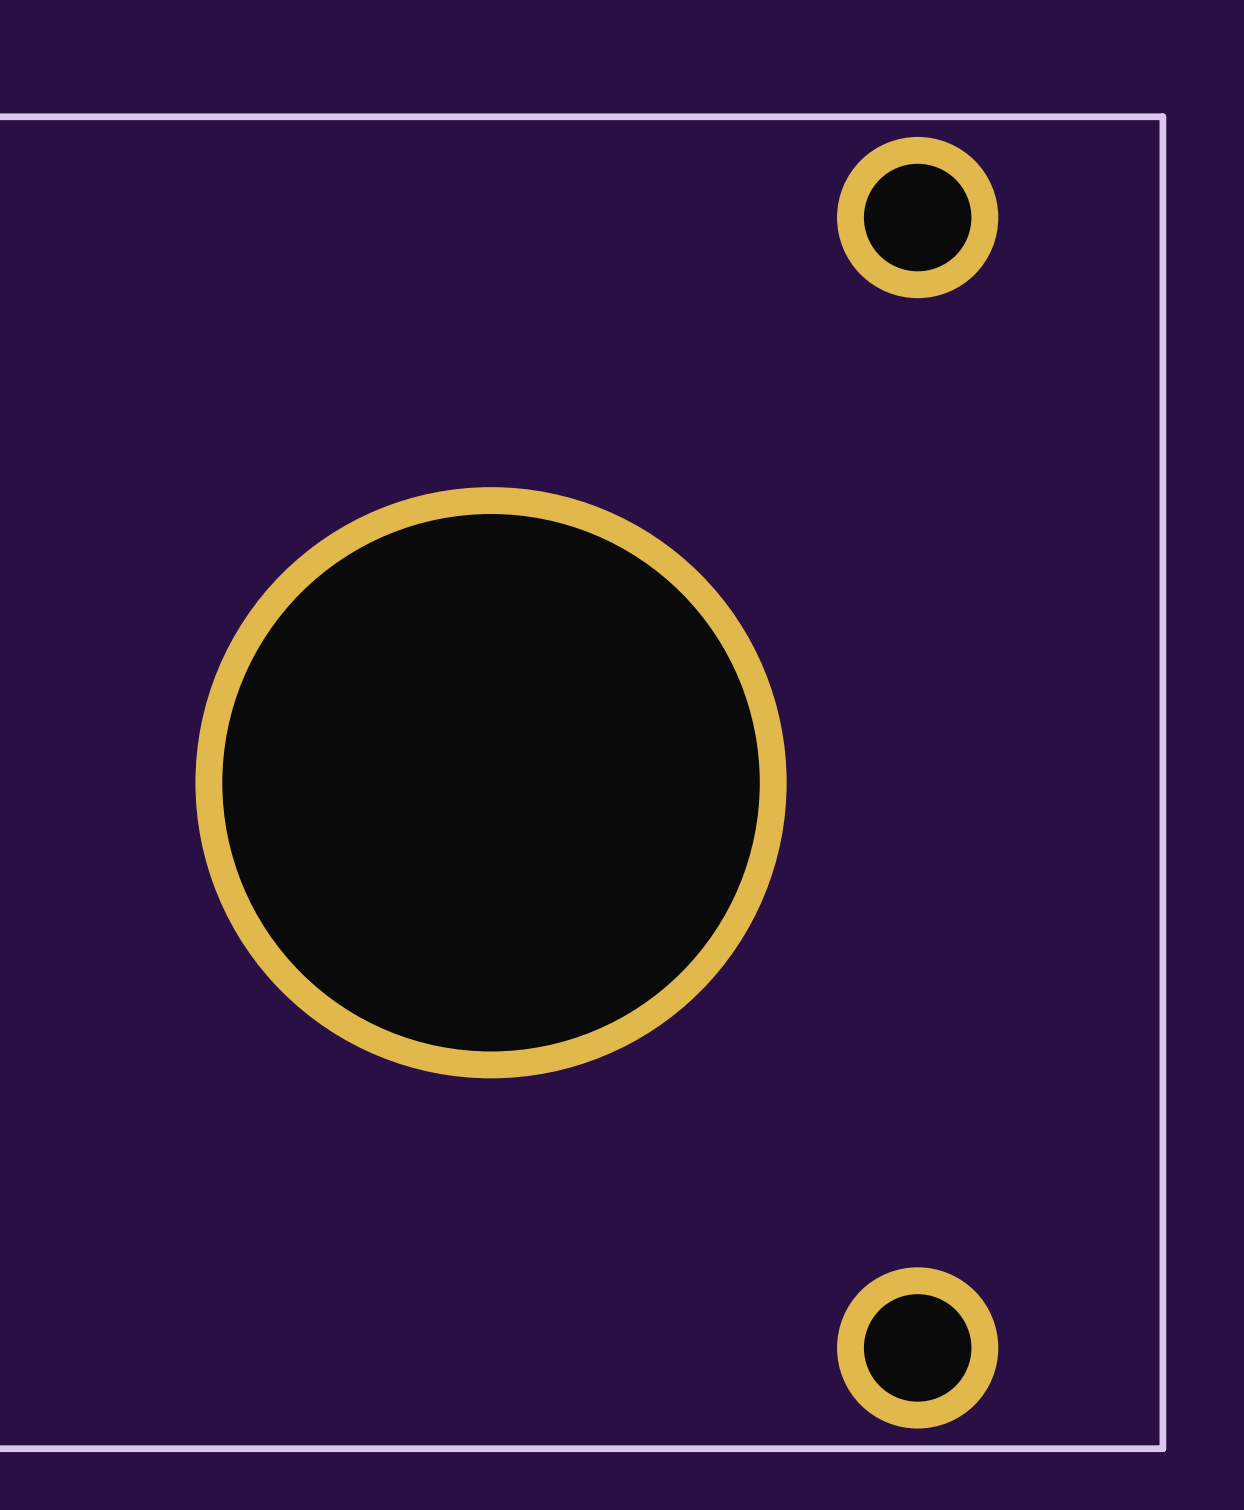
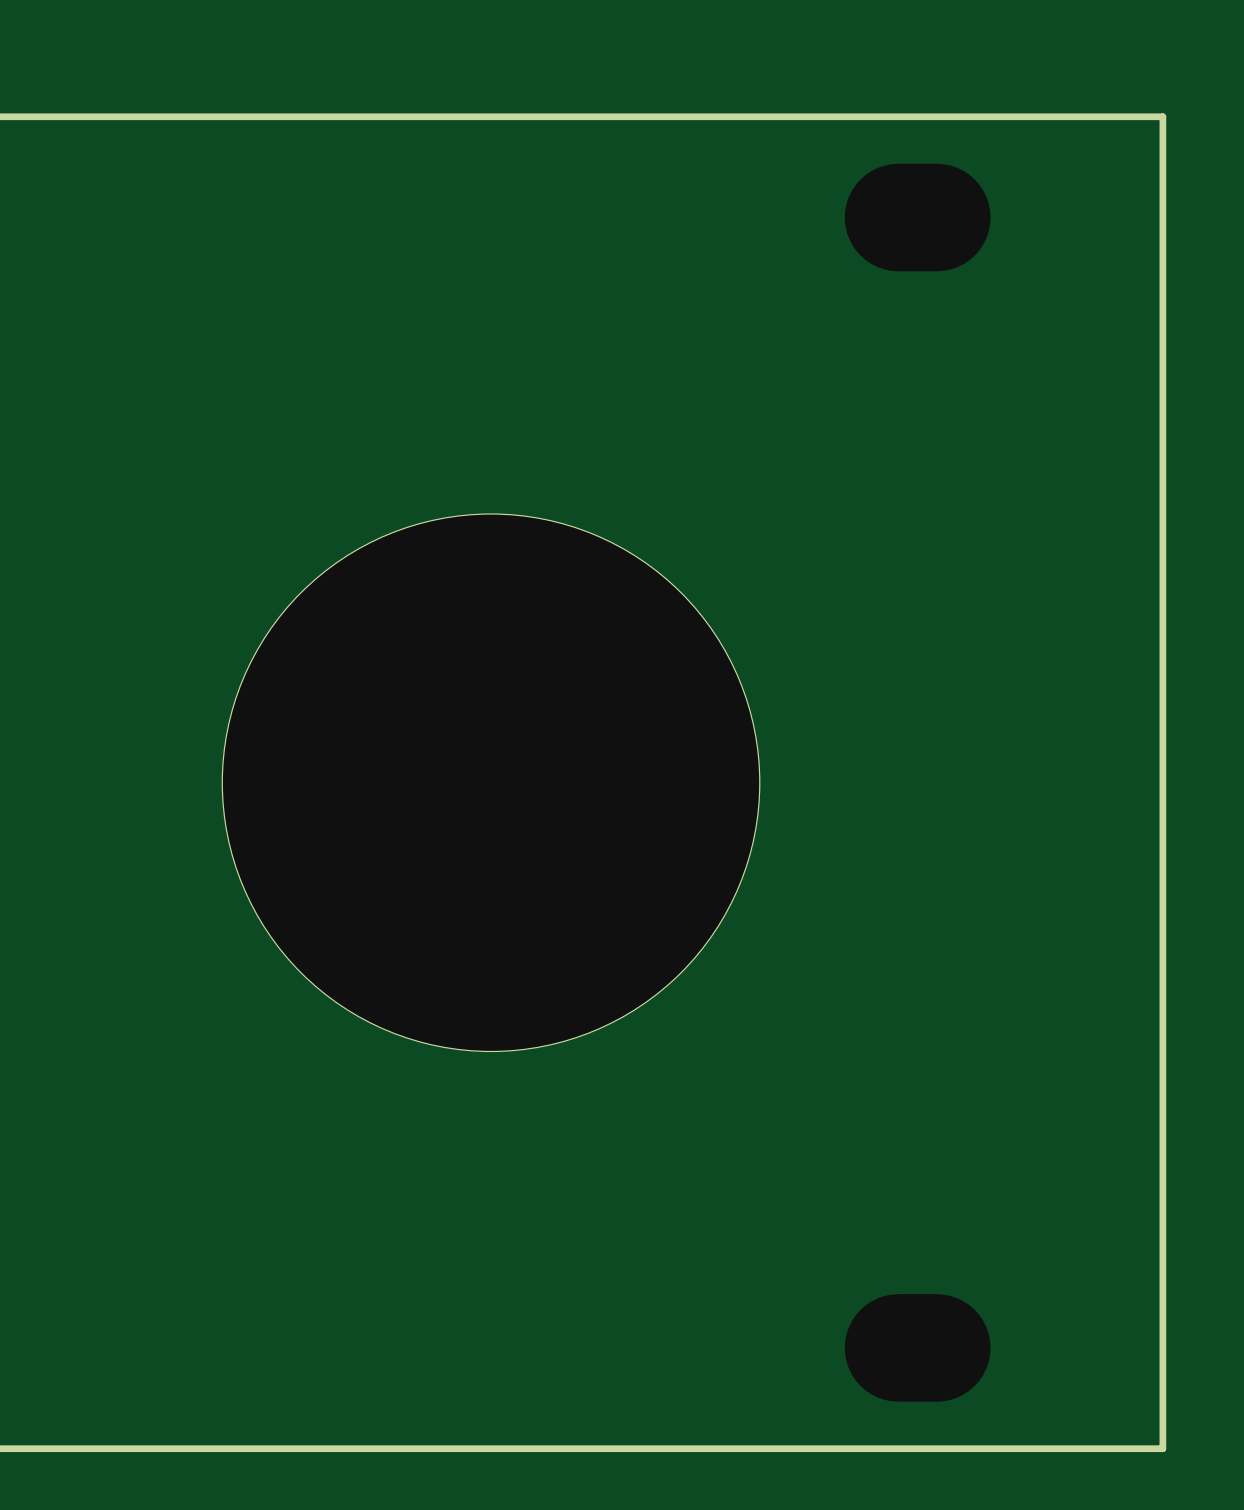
part footprint: [837, 136, 999, 299] -> [844, 163, 991, 272]
part footprint: [195, 487, 787, 1079] -> [222, 514, 760, 1052]
part footprint: [837, 1267, 999, 1429] -> [844, 1294, 991, 1402]

